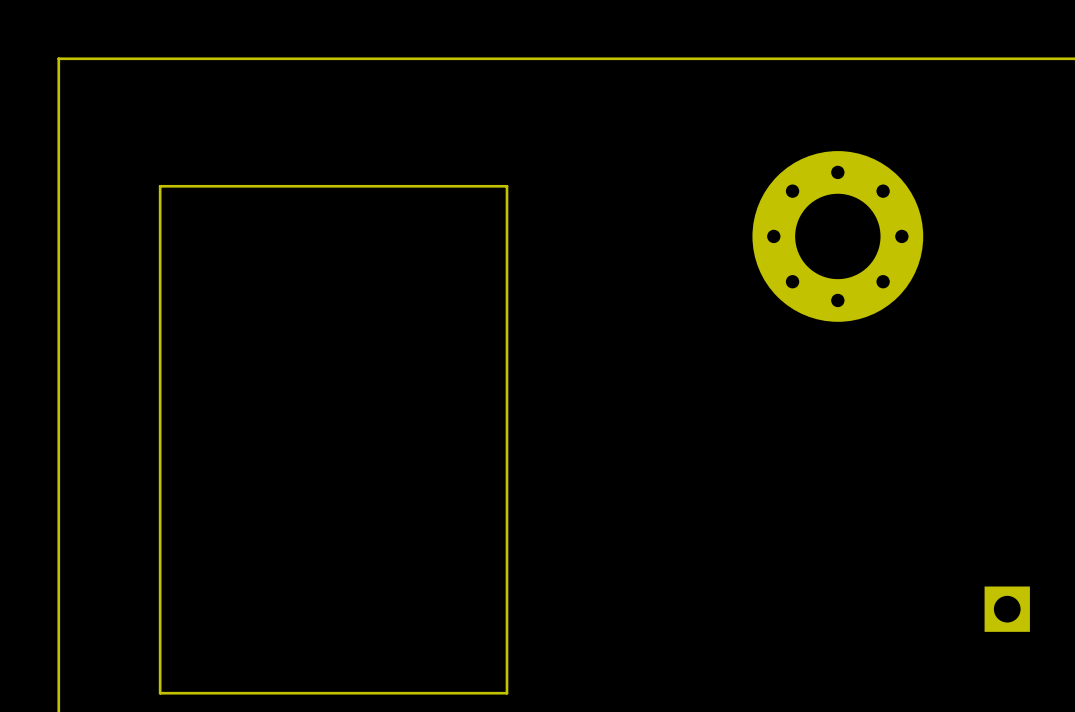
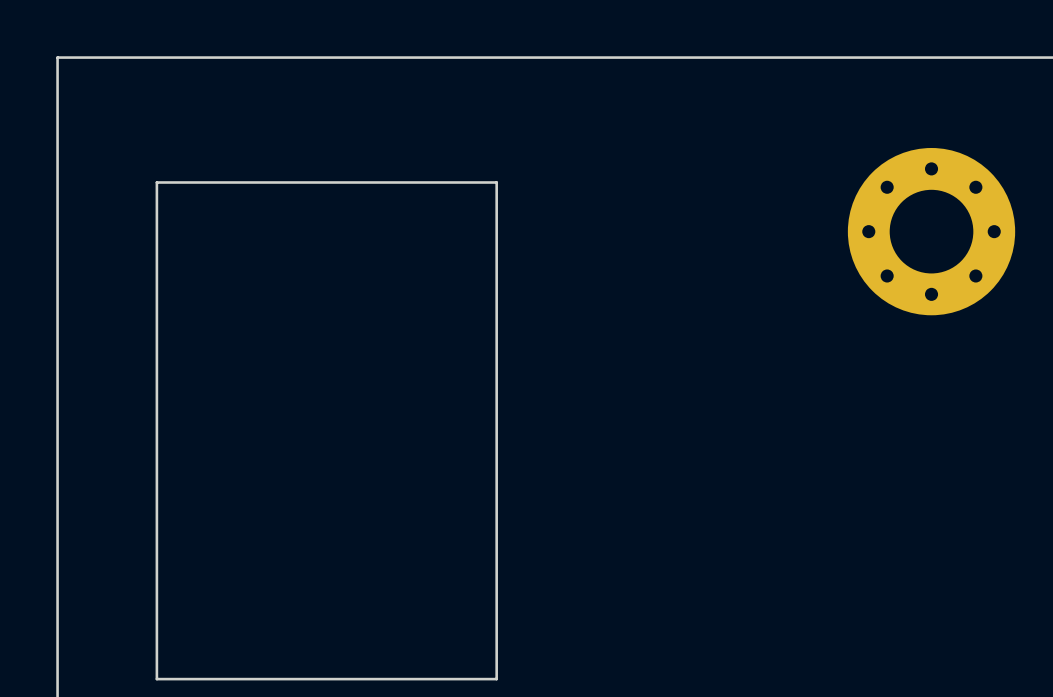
part position: (837, 236) -> (931, 231)
part: (1007, 609) -> none

